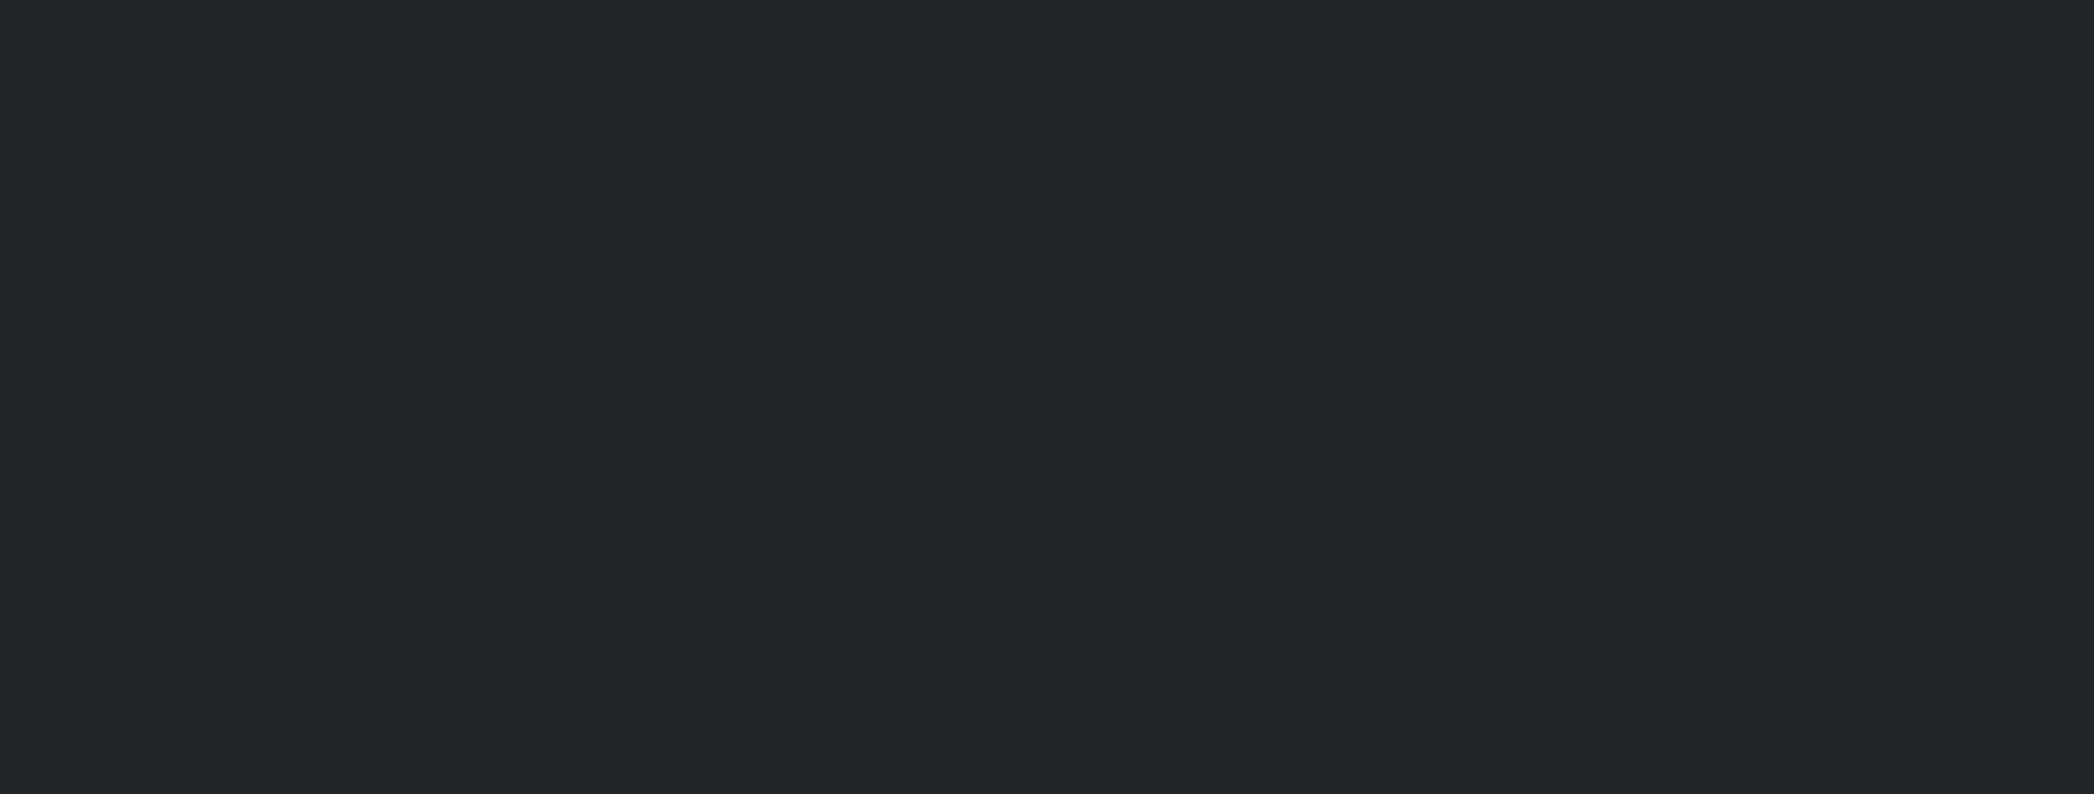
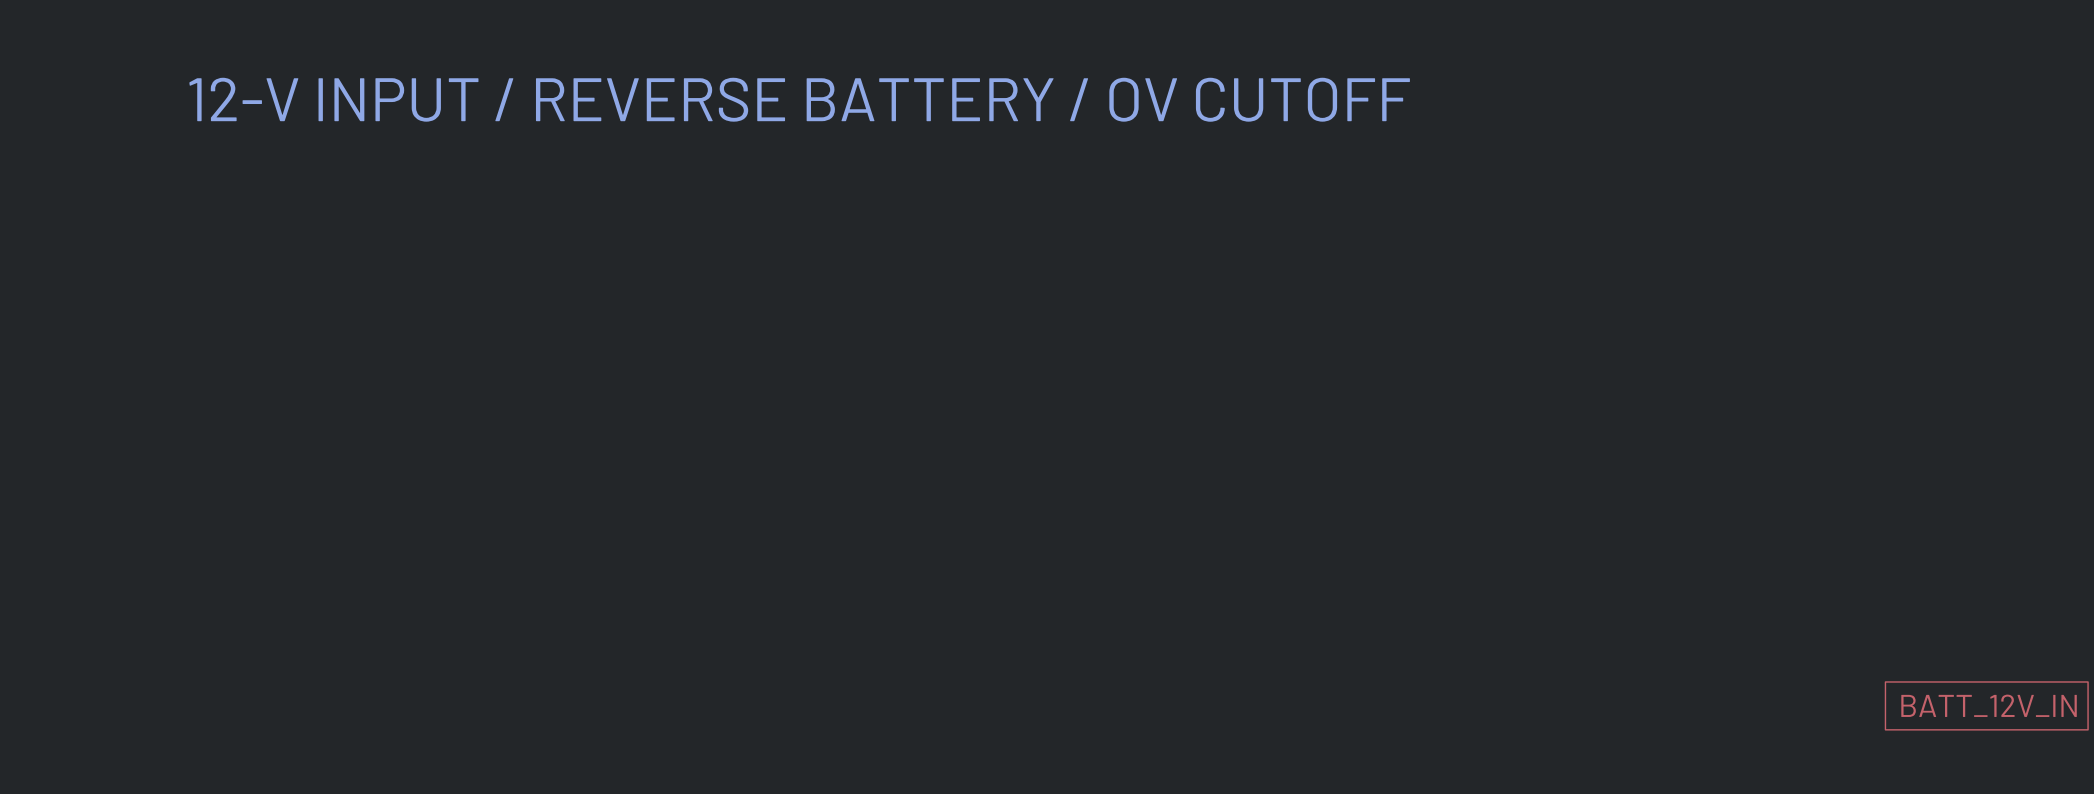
text: none -> 12-V INPUT / REVERSE BATTERY / OV CUTOFF (799, 99)
global label: none -> BATT_12V_IN (1989, 705)

